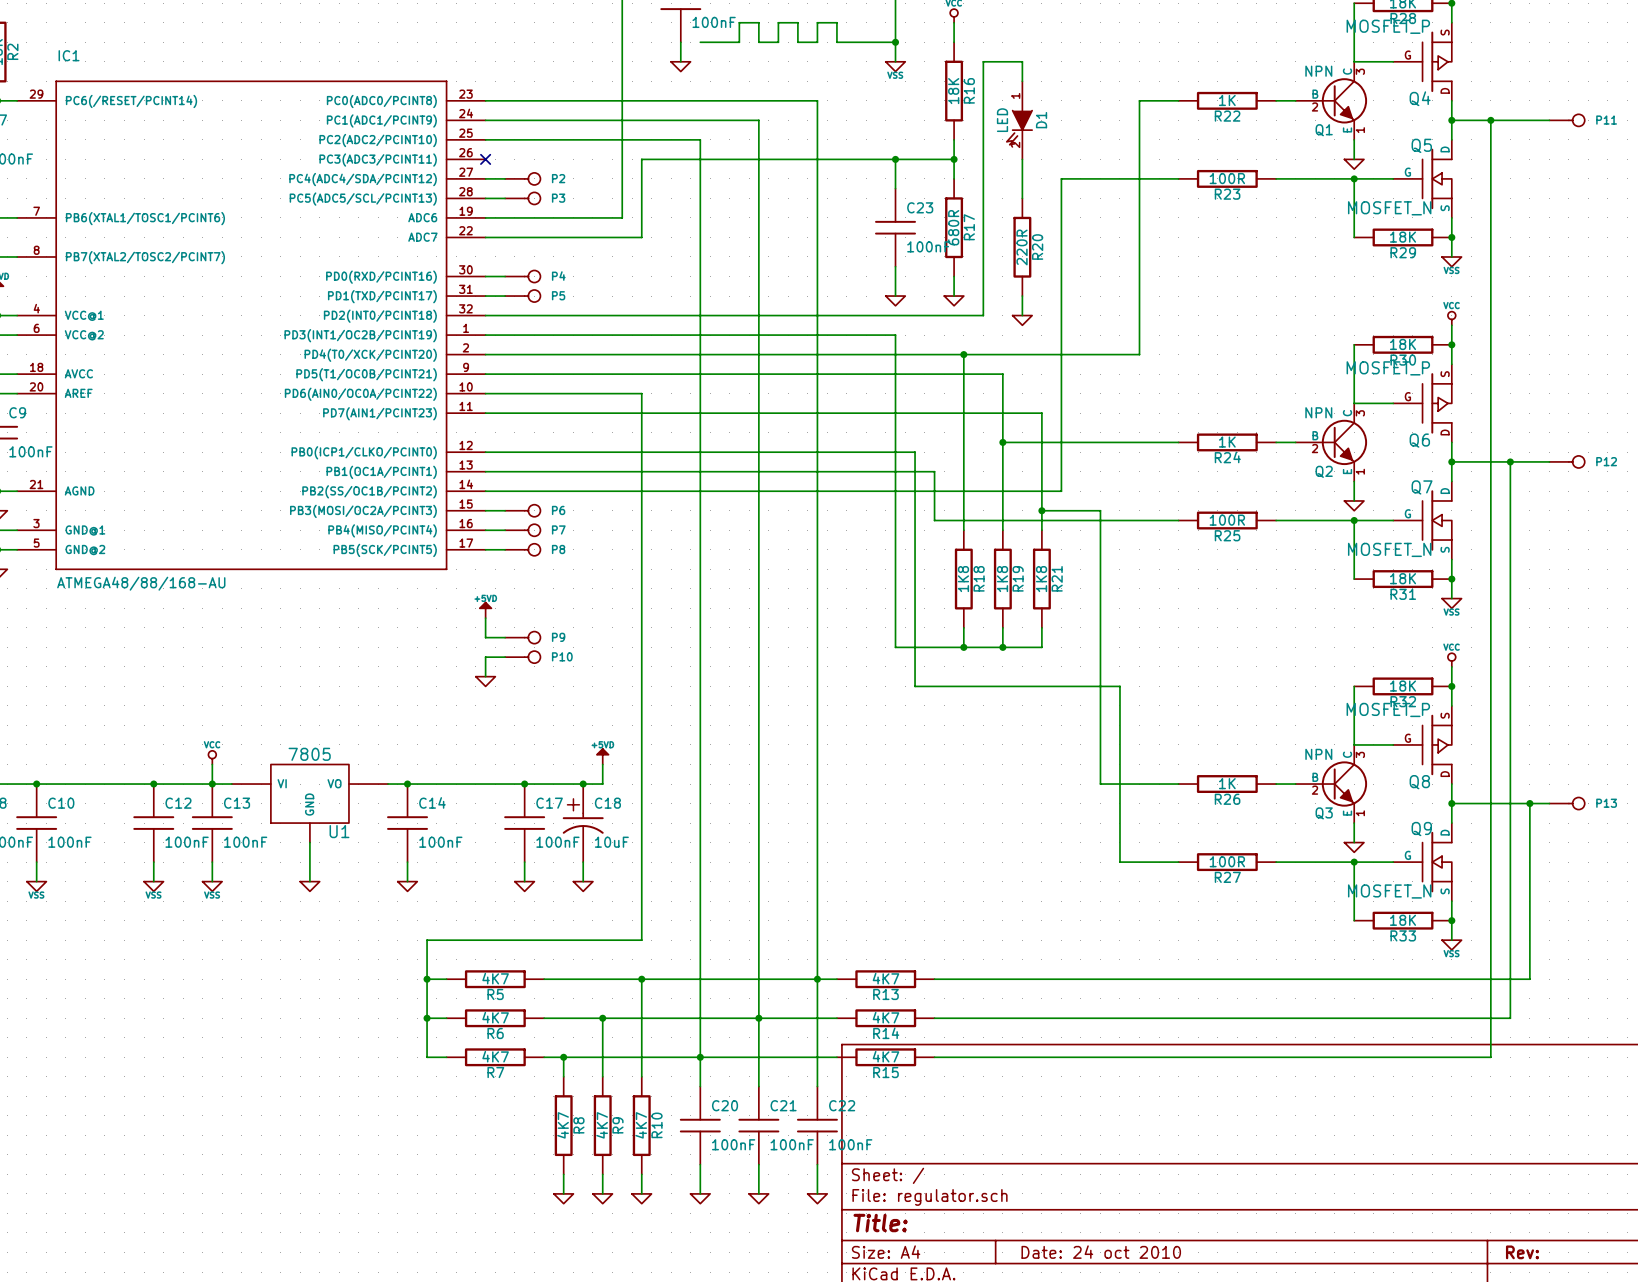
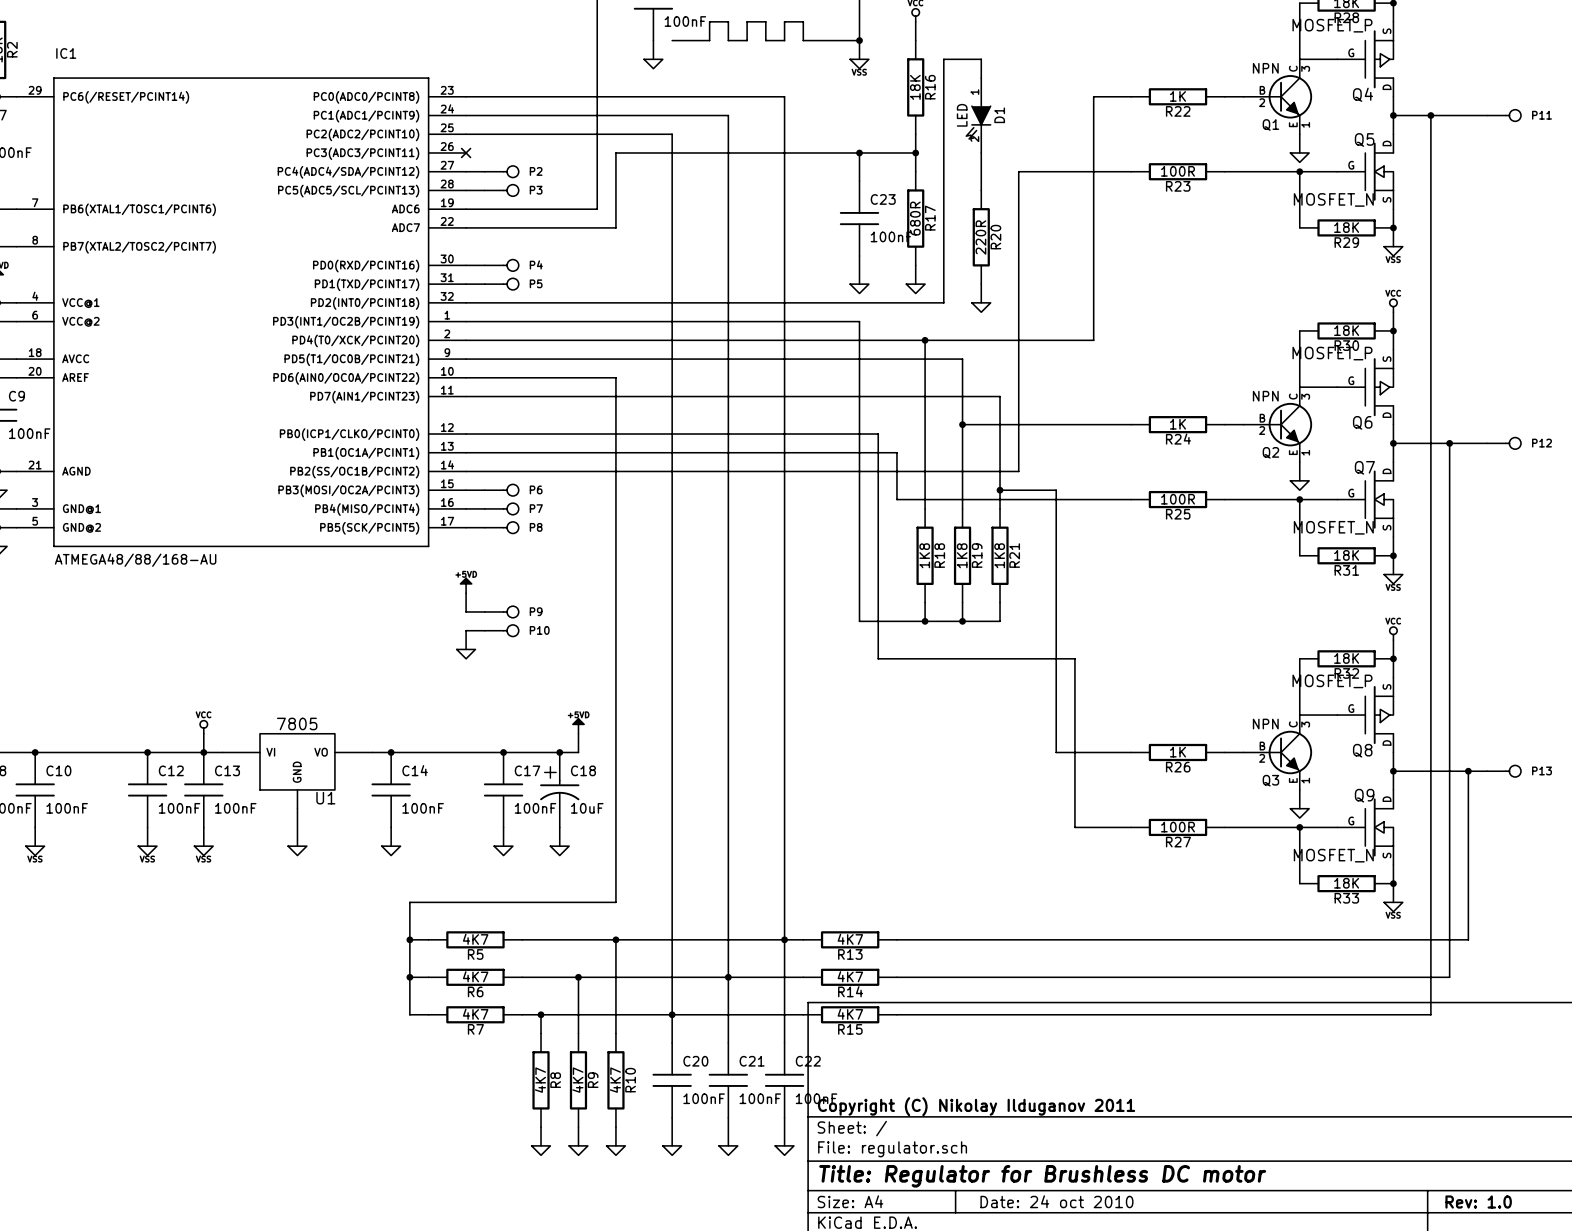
title block: none -> Copyright (C) Nikolay Ilduganov 2011 (976, 1106)
title block: Title: (880, 1223) -> Title: Regulator for Brushless DC motor (1042, 1176)
title block: Rev: (1522, 1252) -> Rev: 1.0 (1478, 1202)

